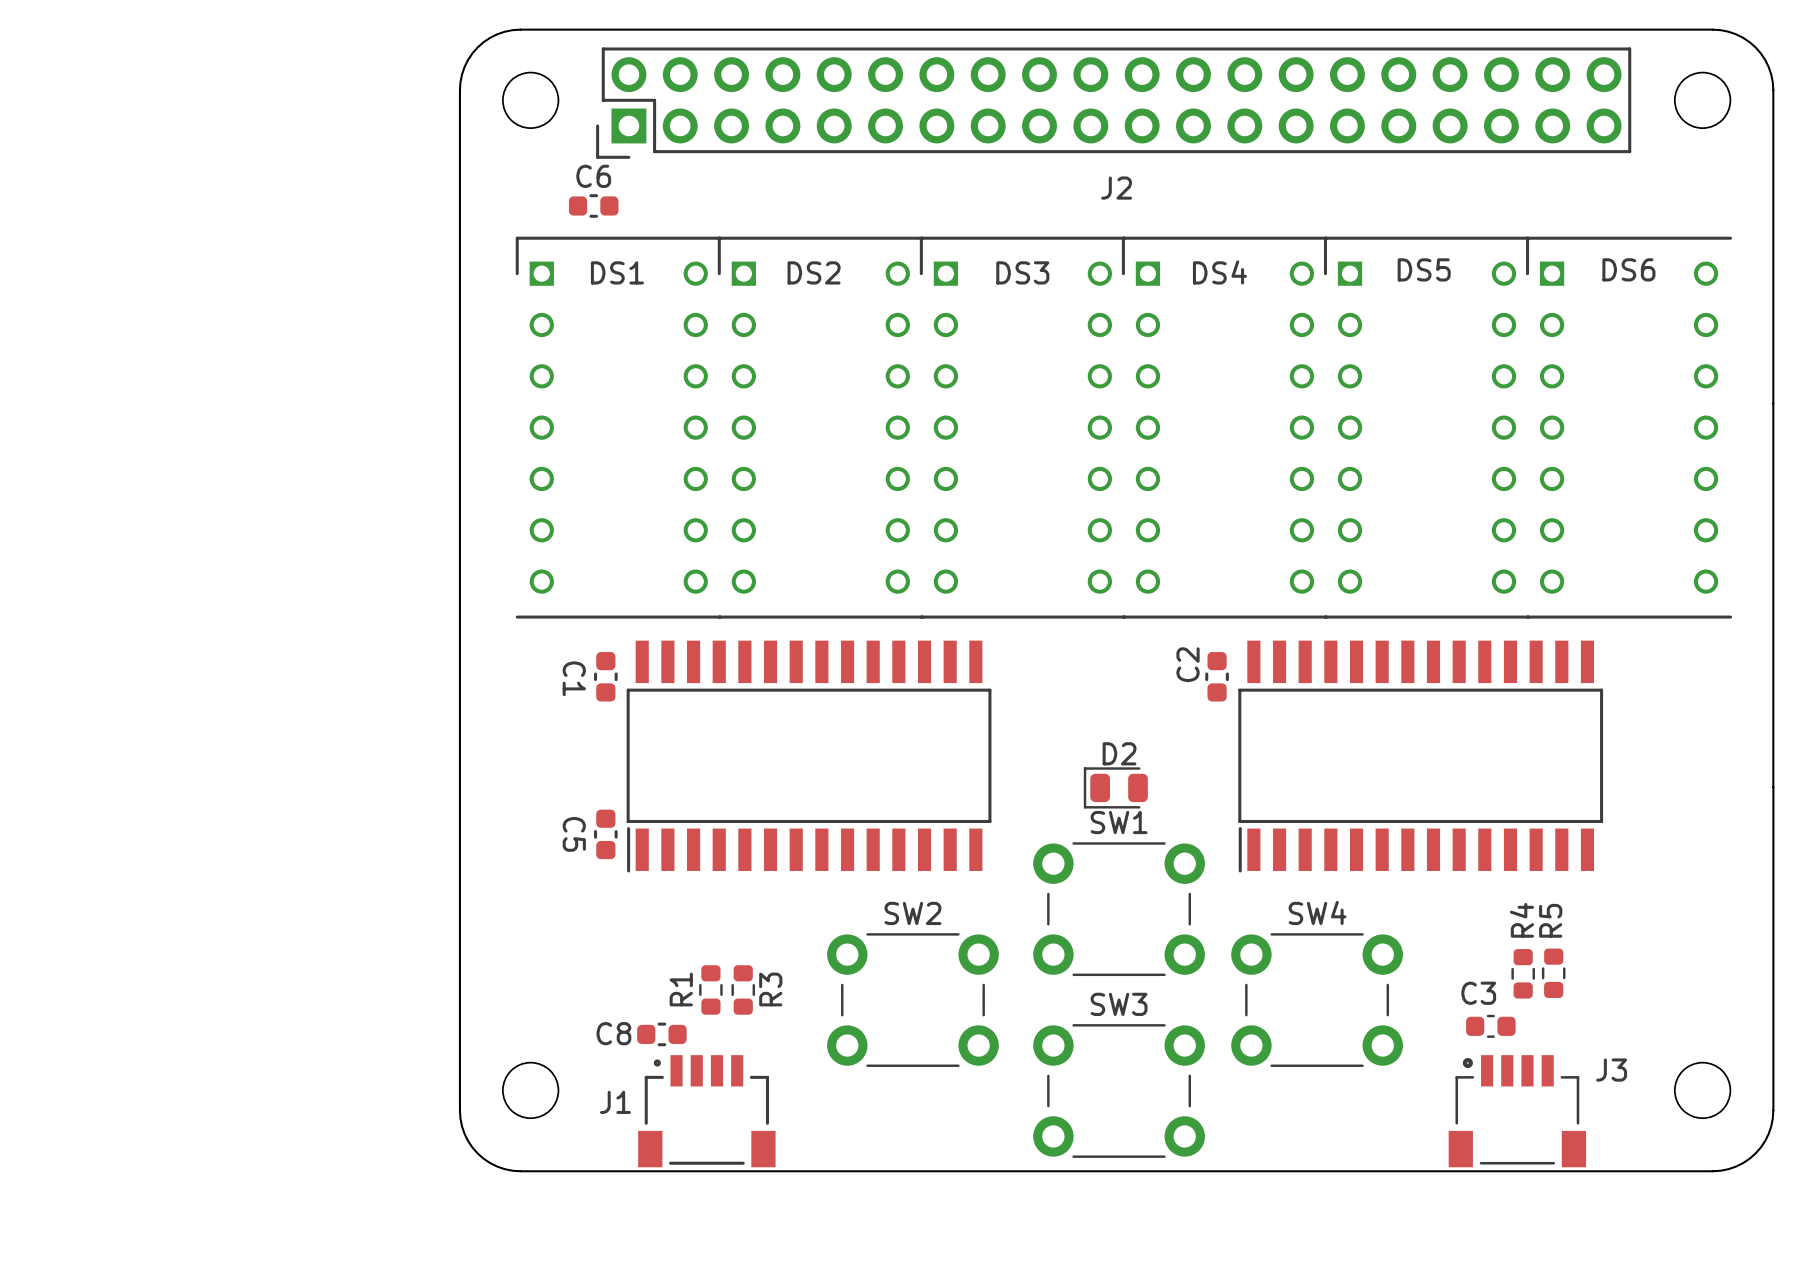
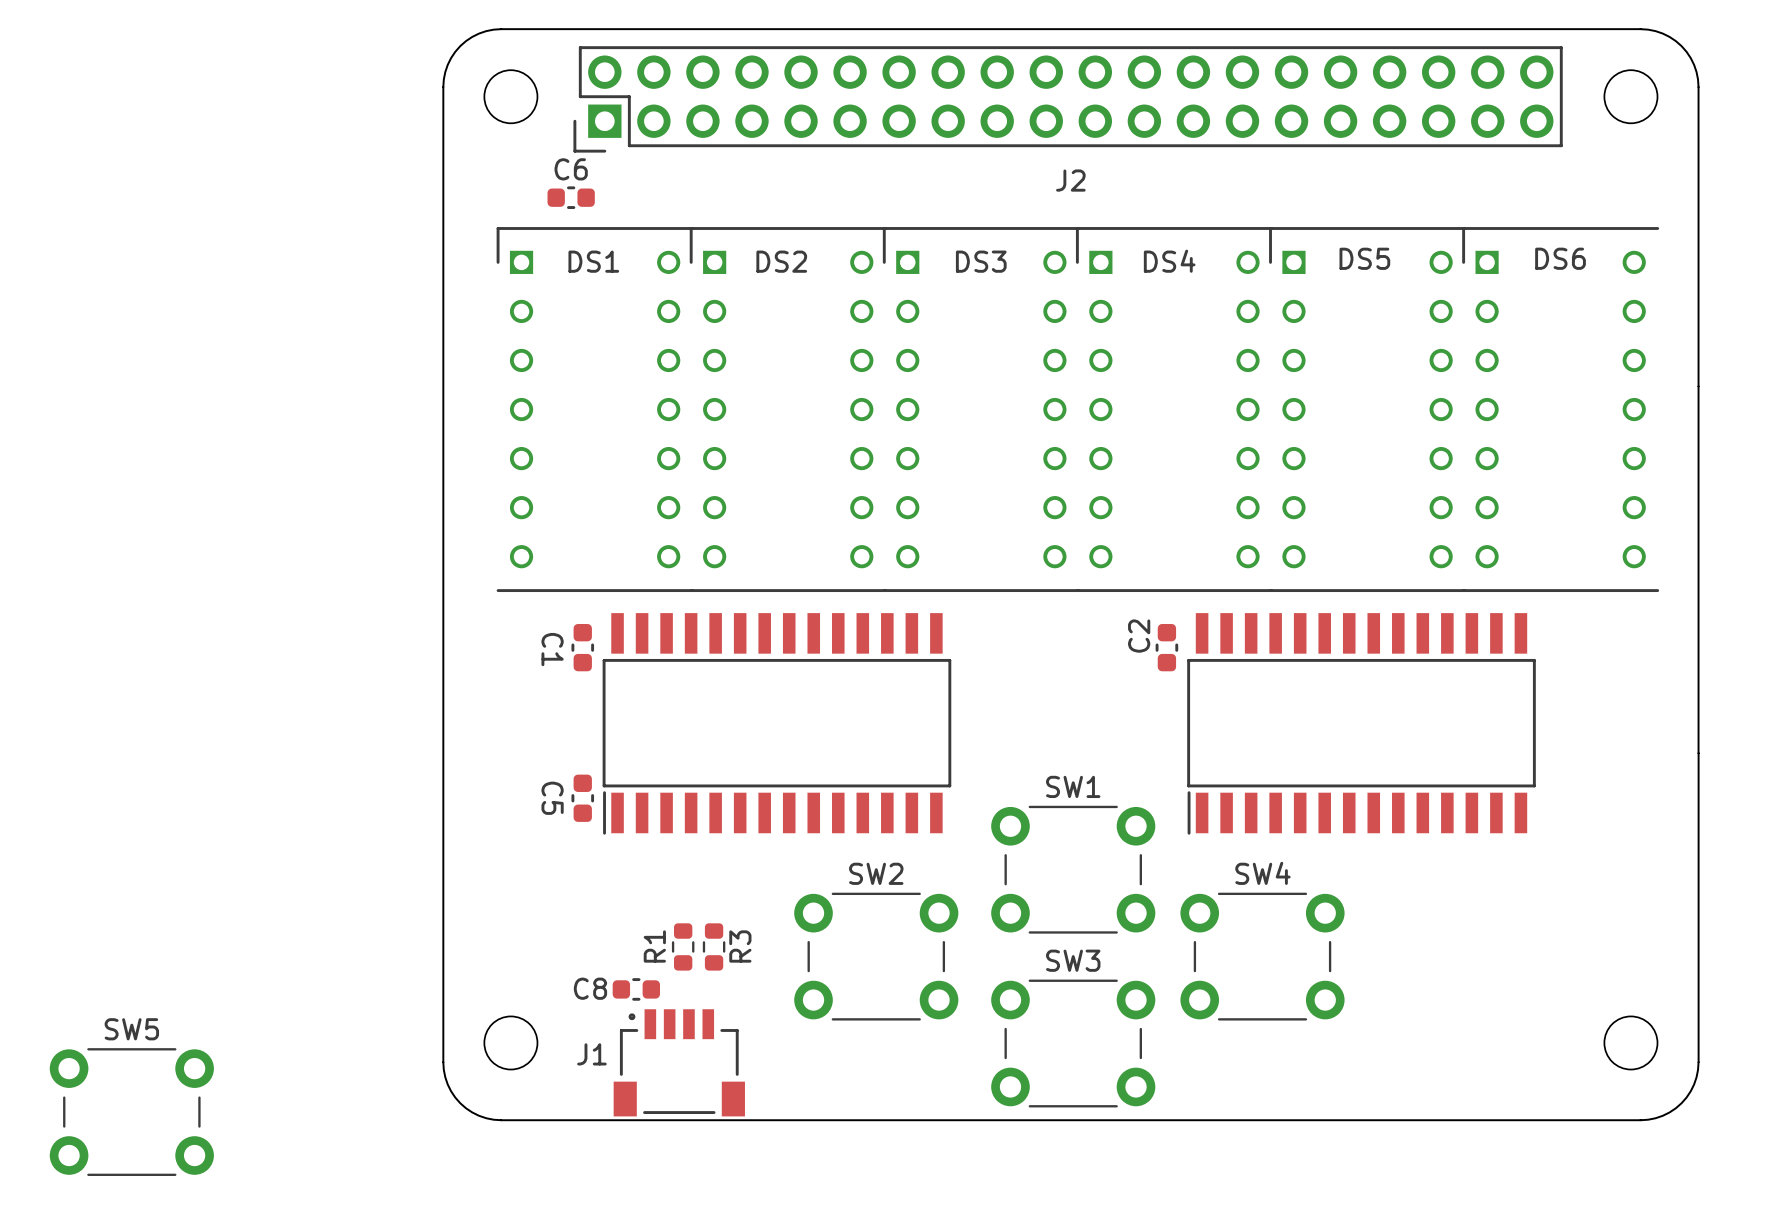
D2: (1115, 787) -> none
R4: (1523, 973) -> none
R5: (1553, 973) -> none
C3: (1490, 1026) -> none
J3: (1517, 1111) -> none
SW5: none -> (131, 1112)

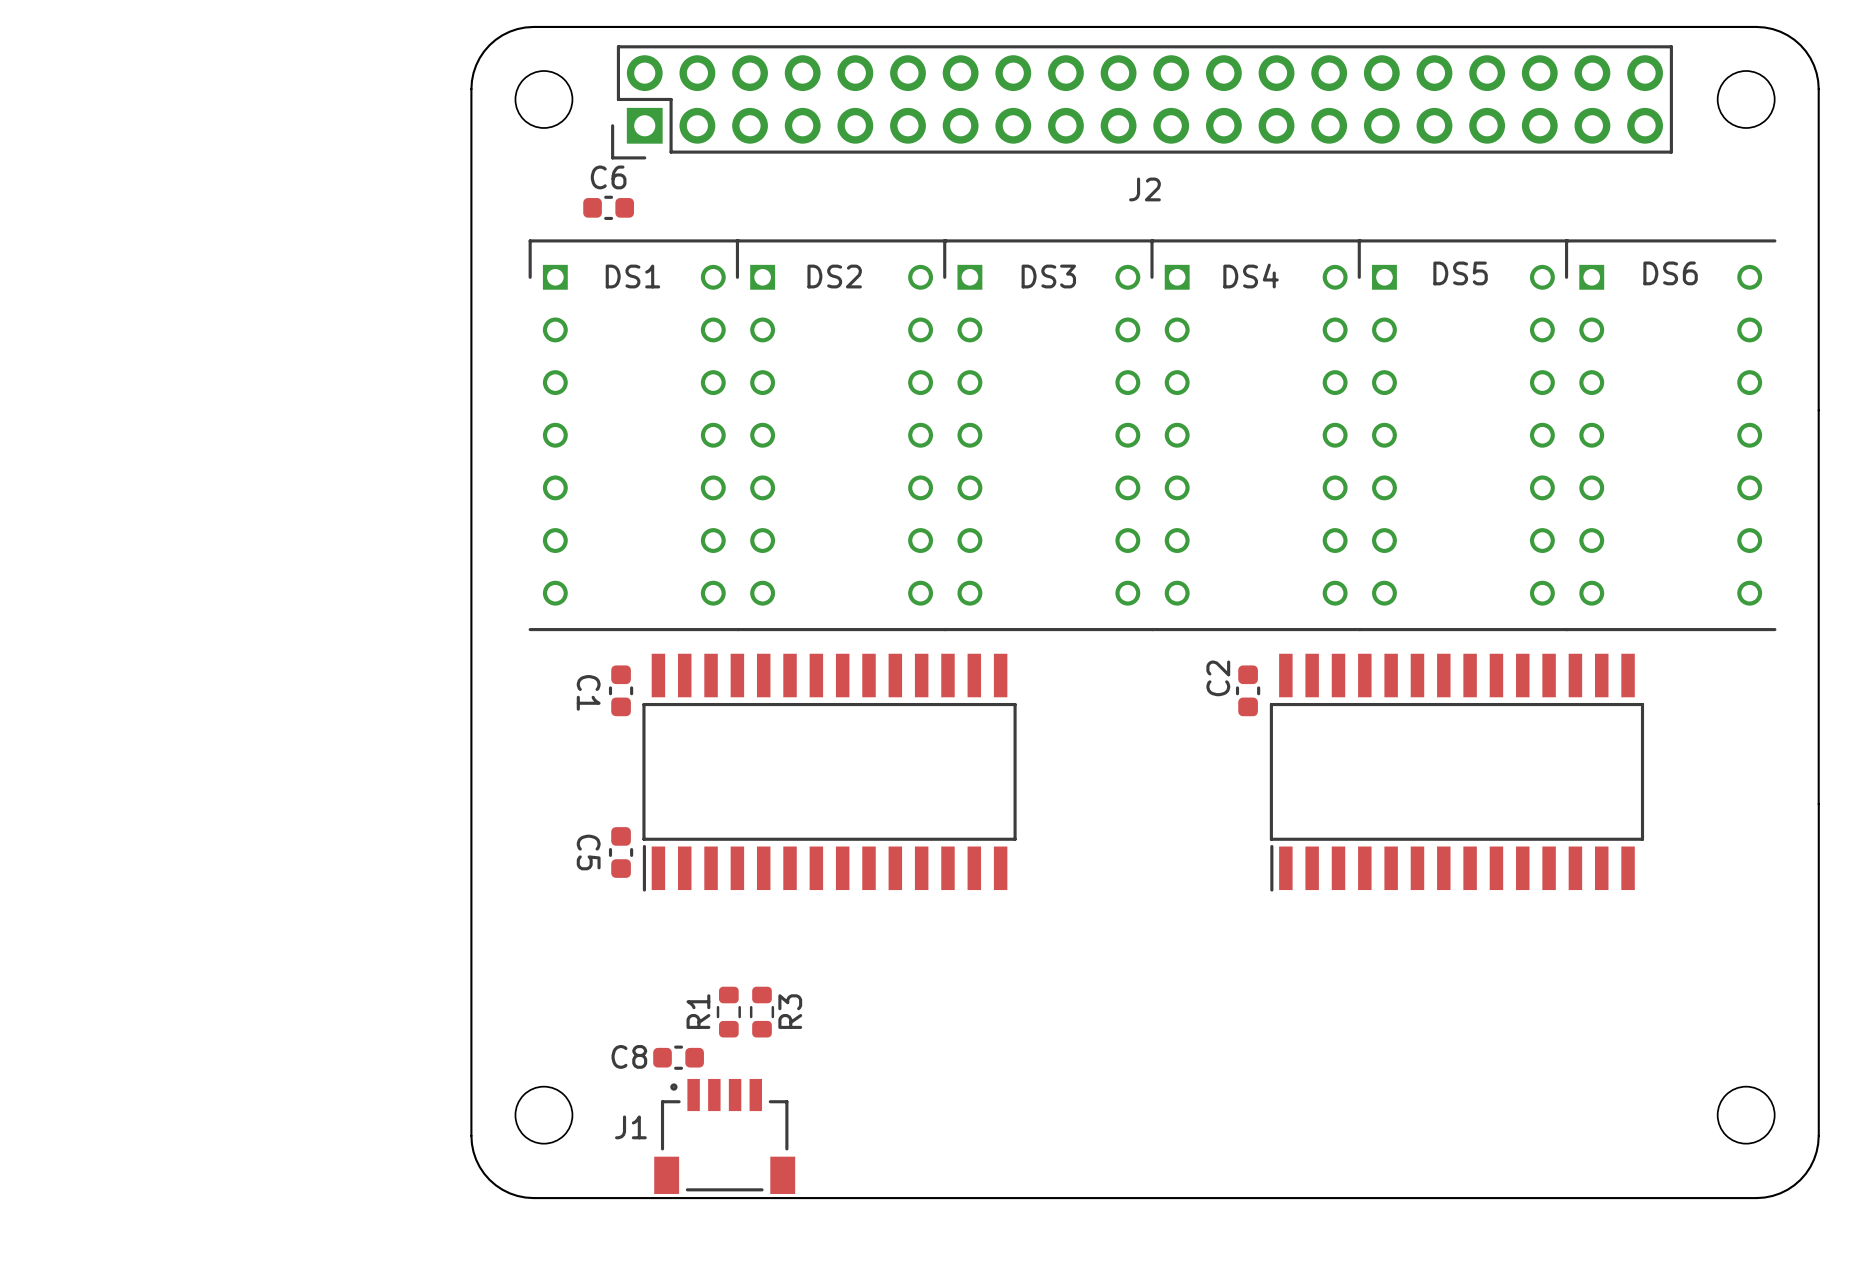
SW1: (1073, 869) -> none
SW2: (876, 956) -> none
SW4: (1262, 956) -> none
SW3: (1073, 1043) -> none
SW5: (131, 1112) -> none

